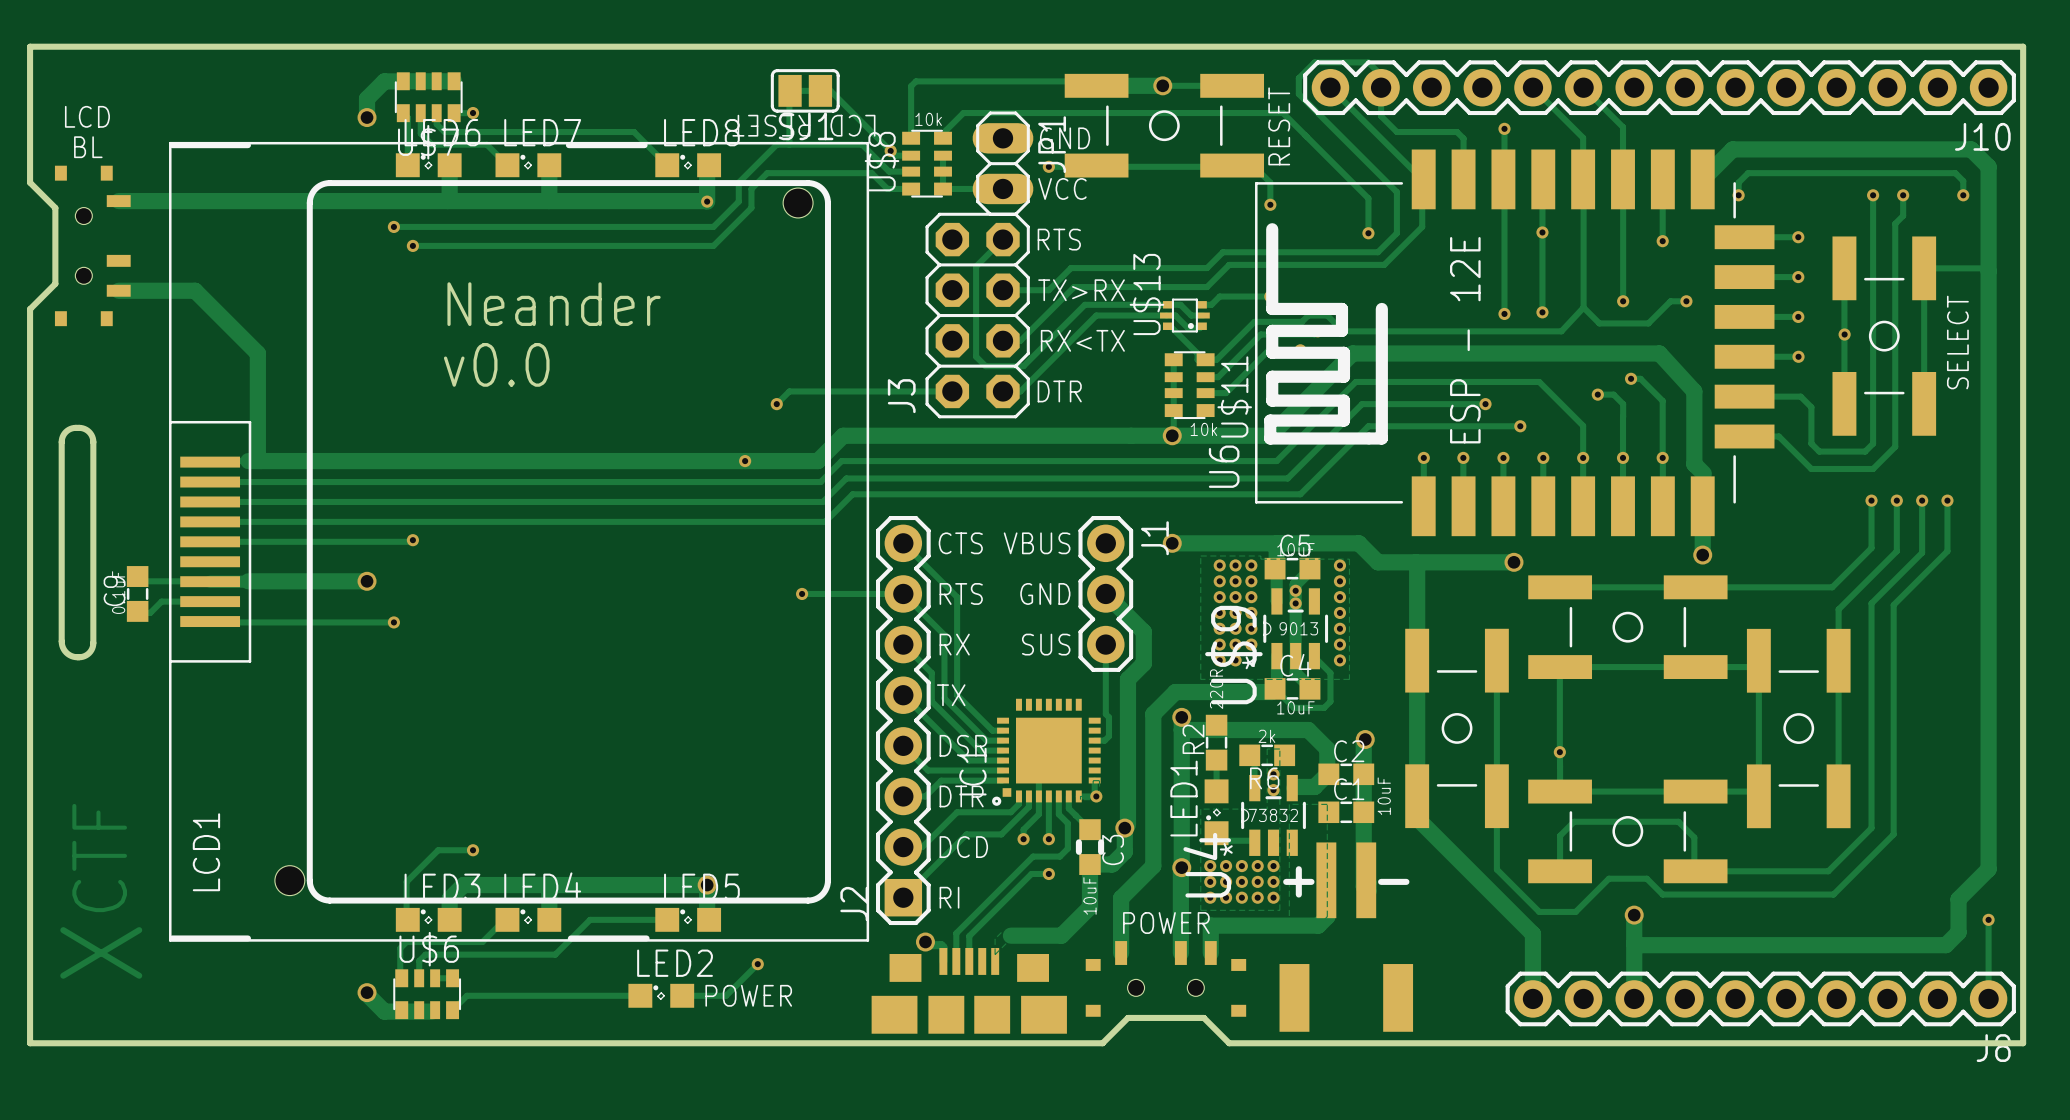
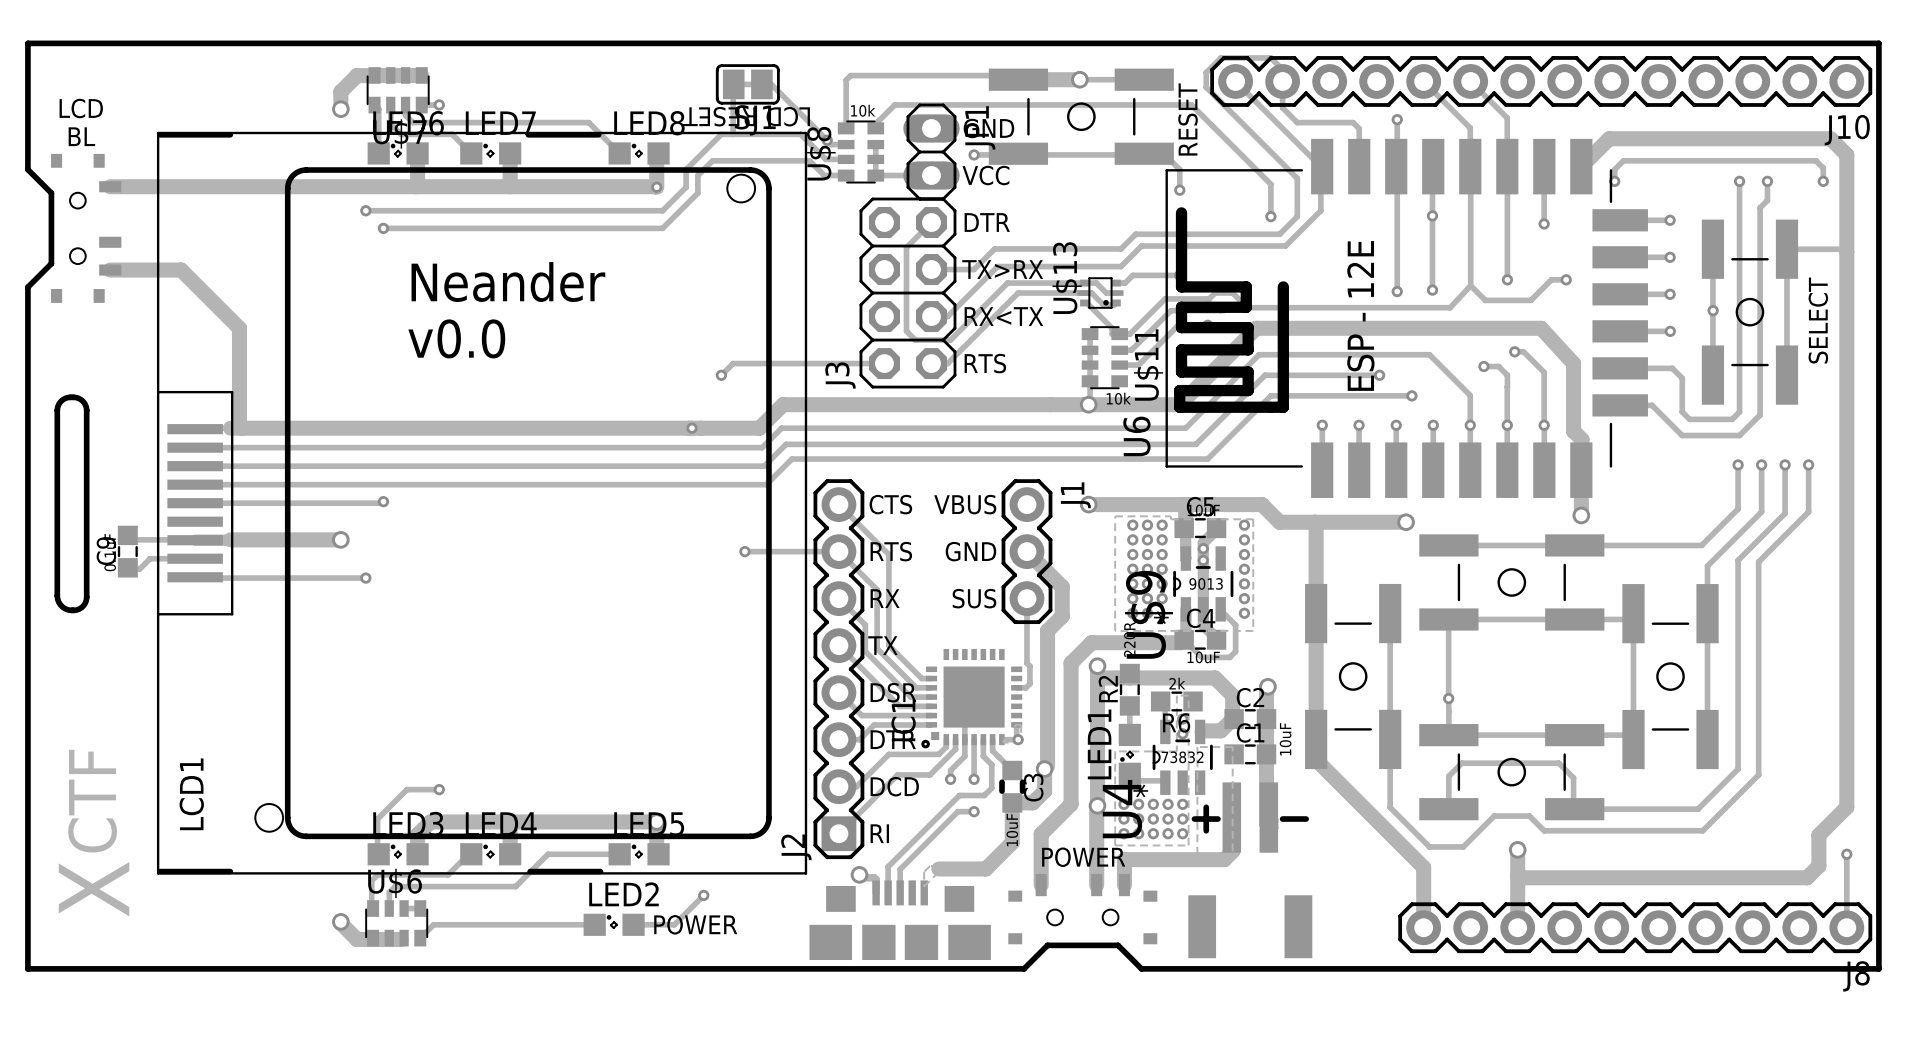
text position: RTS (1059, 239) -> RTS (985, 363)
text position: DTR (1059, 391) -> DTR (987, 222)

